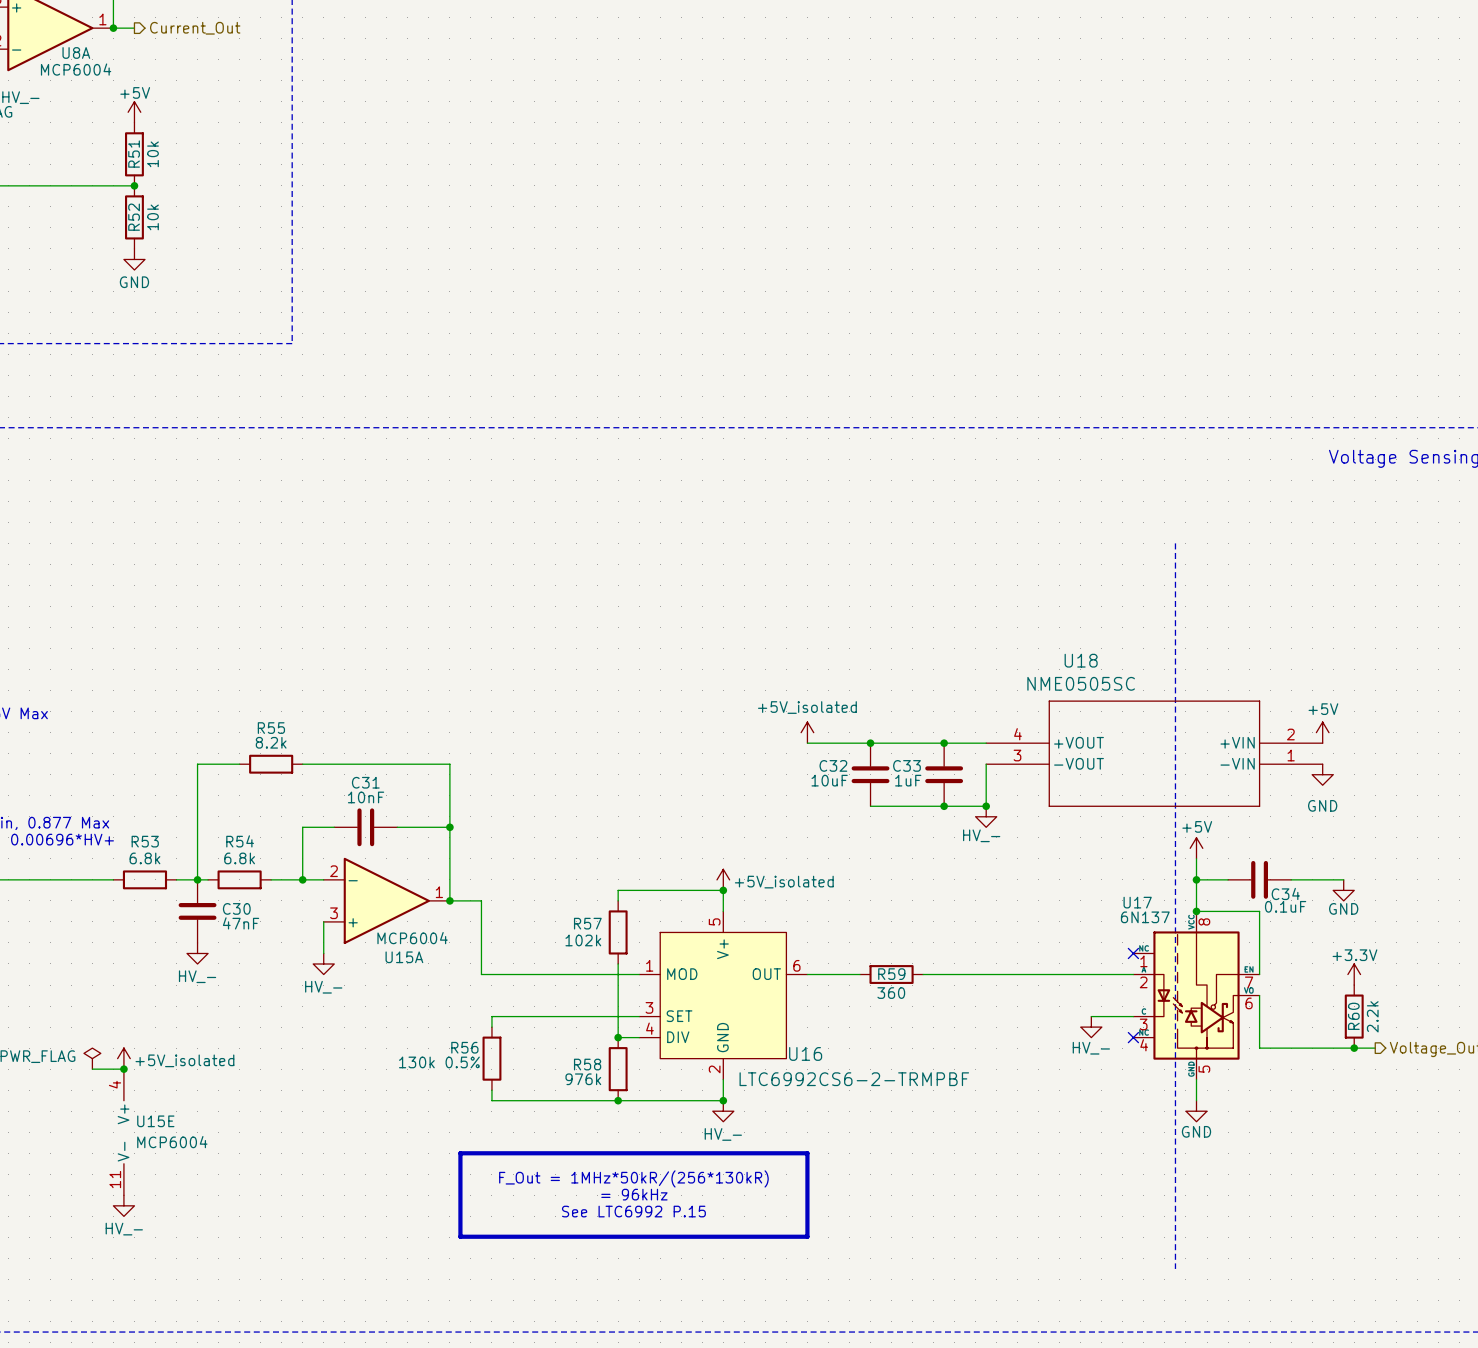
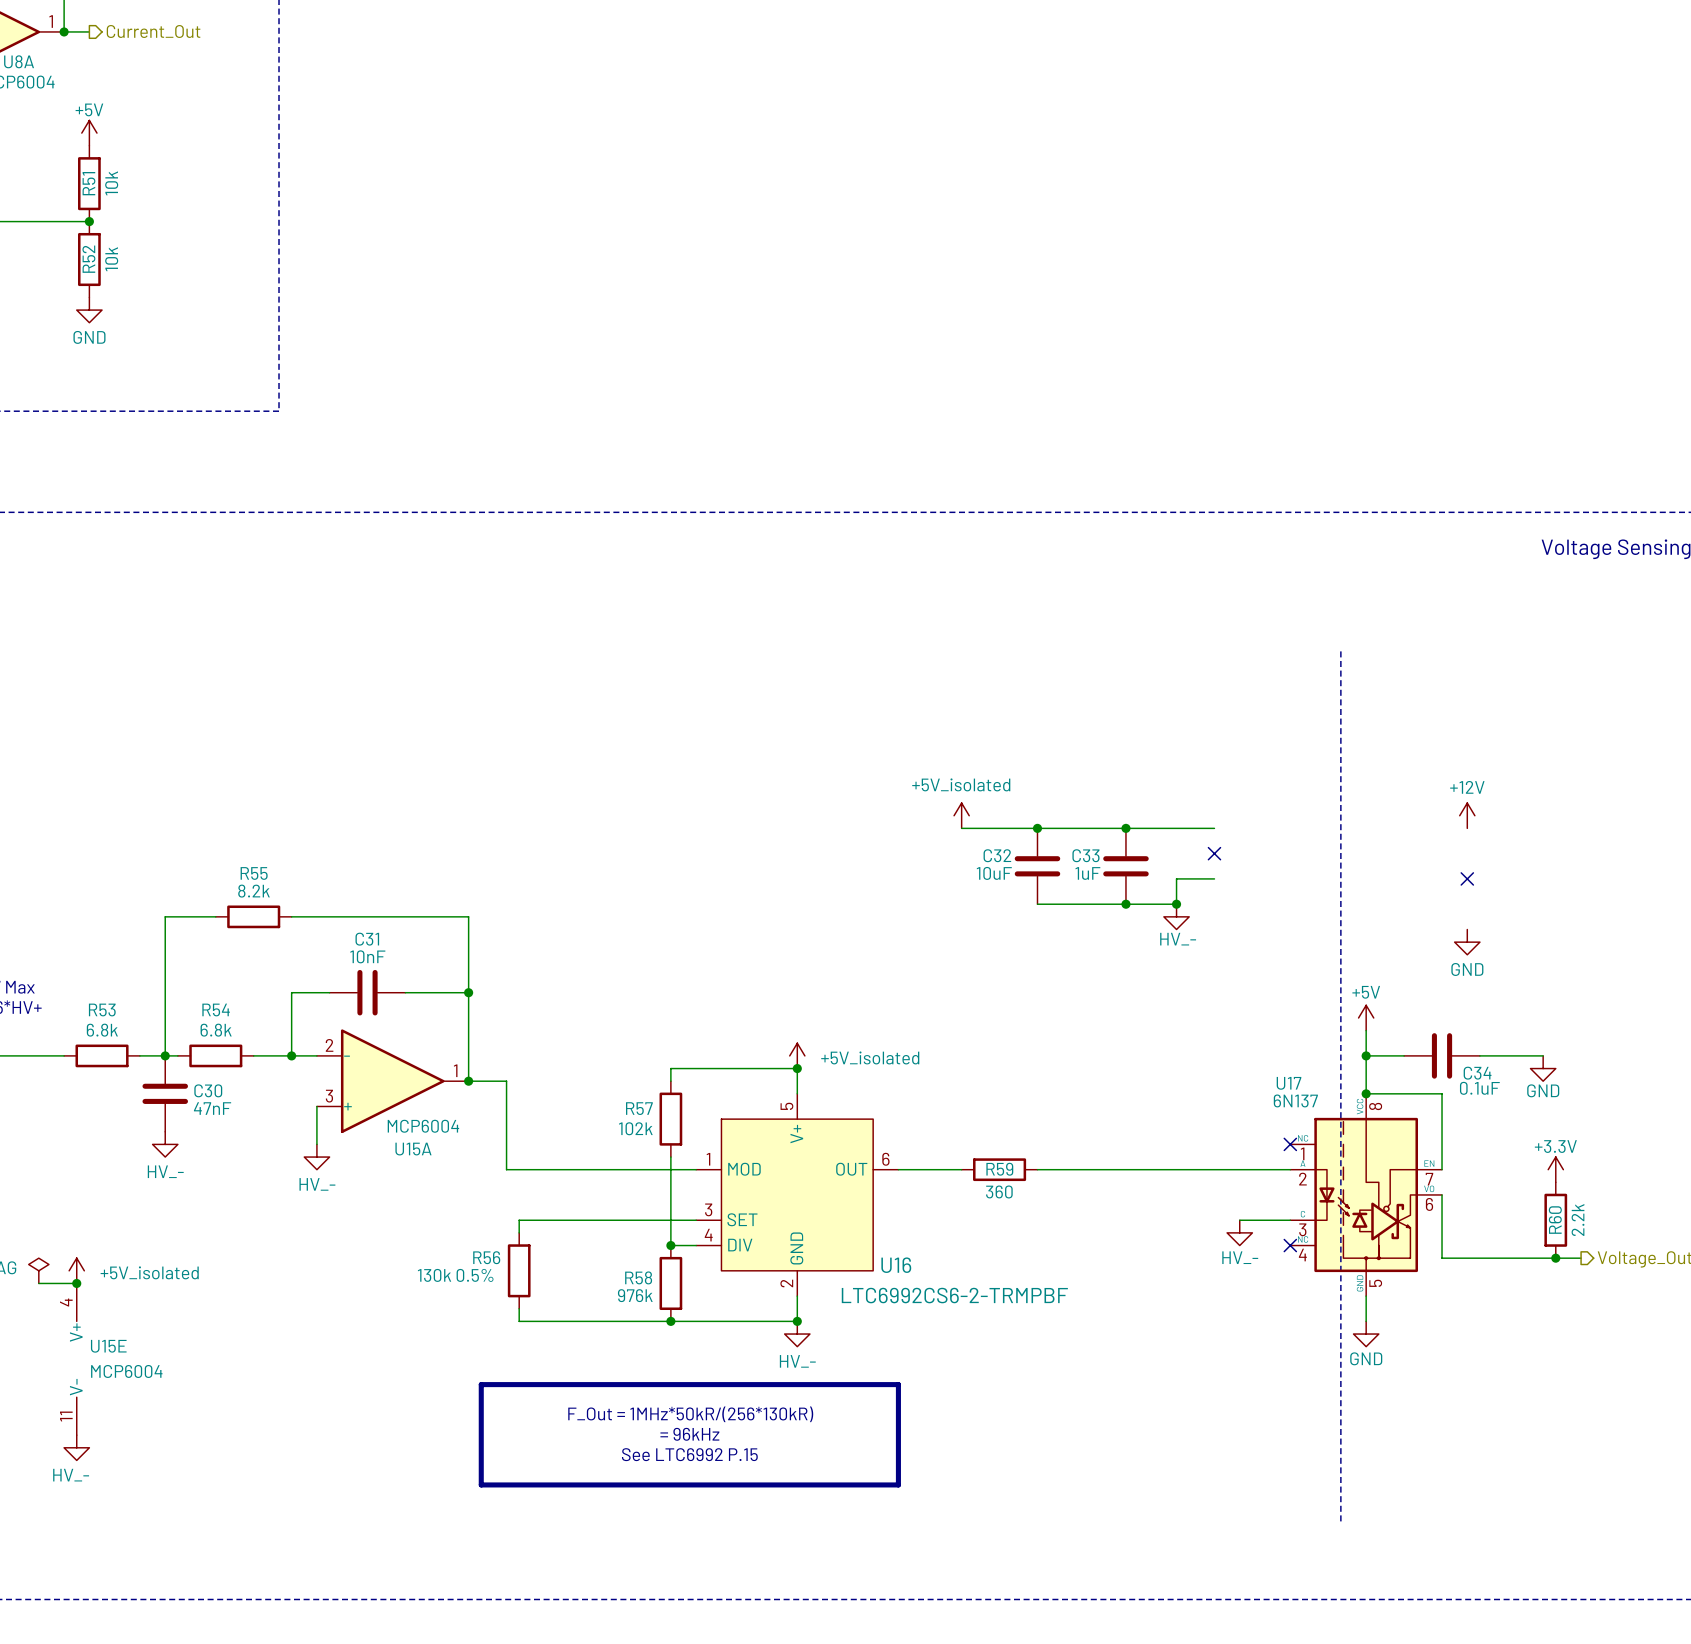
power symbol: none -> +12V (1467, 815)
wire: none -> (961, 828) (1214, 828)
junction: none -> (1037, 828)
junction: none -> (1125, 828)
no-connect mark: none -> (1214, 853)
power symbol position: +5V_isolated (807, 732) -> +5V_isolated (961, 815)
wire: none -> (1214, 878) (1176, 878) (1176, 904) (1037, 904)
no-connect mark: none -> (1467, 878)
power symbol: +5V (1322, 732) -> none
wire: (807, 743) (986, 743) -> none
junction: (870, 743) -> none
junction: (944, 743) -> none
junction: none -> (1125, 904)
junction: none -> (1176, 904)
U18: NME0505SC (1154, 753) -> none
wire: (986, 764) (986, 806) (870, 806) -> none
C32 position: (870, 774) -> (1037, 866)
C33 position: (944, 774) -> (1125, 866)
power symbol position: GND (1322, 774) -> GND (1467, 942)
power symbol text position: GND (1322, 805) -> GND (1467, 969)
junction: (944, 806) -> none
junction: (986, 806) -> none
power symbol position: HV_- (986, 816) -> HV_- (1176, 916)

